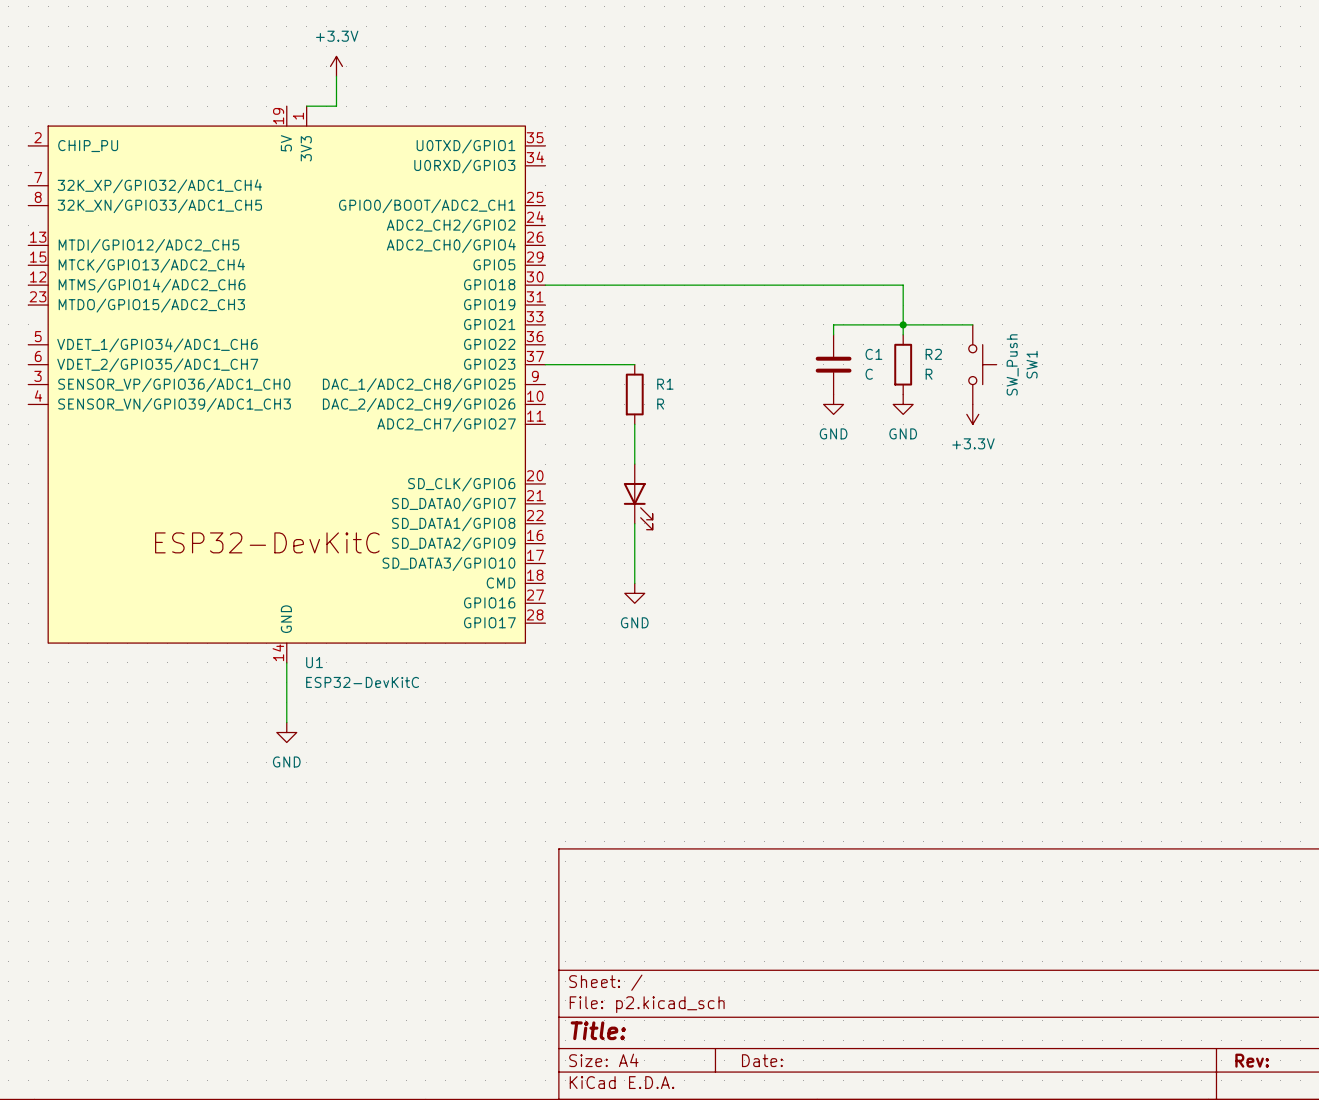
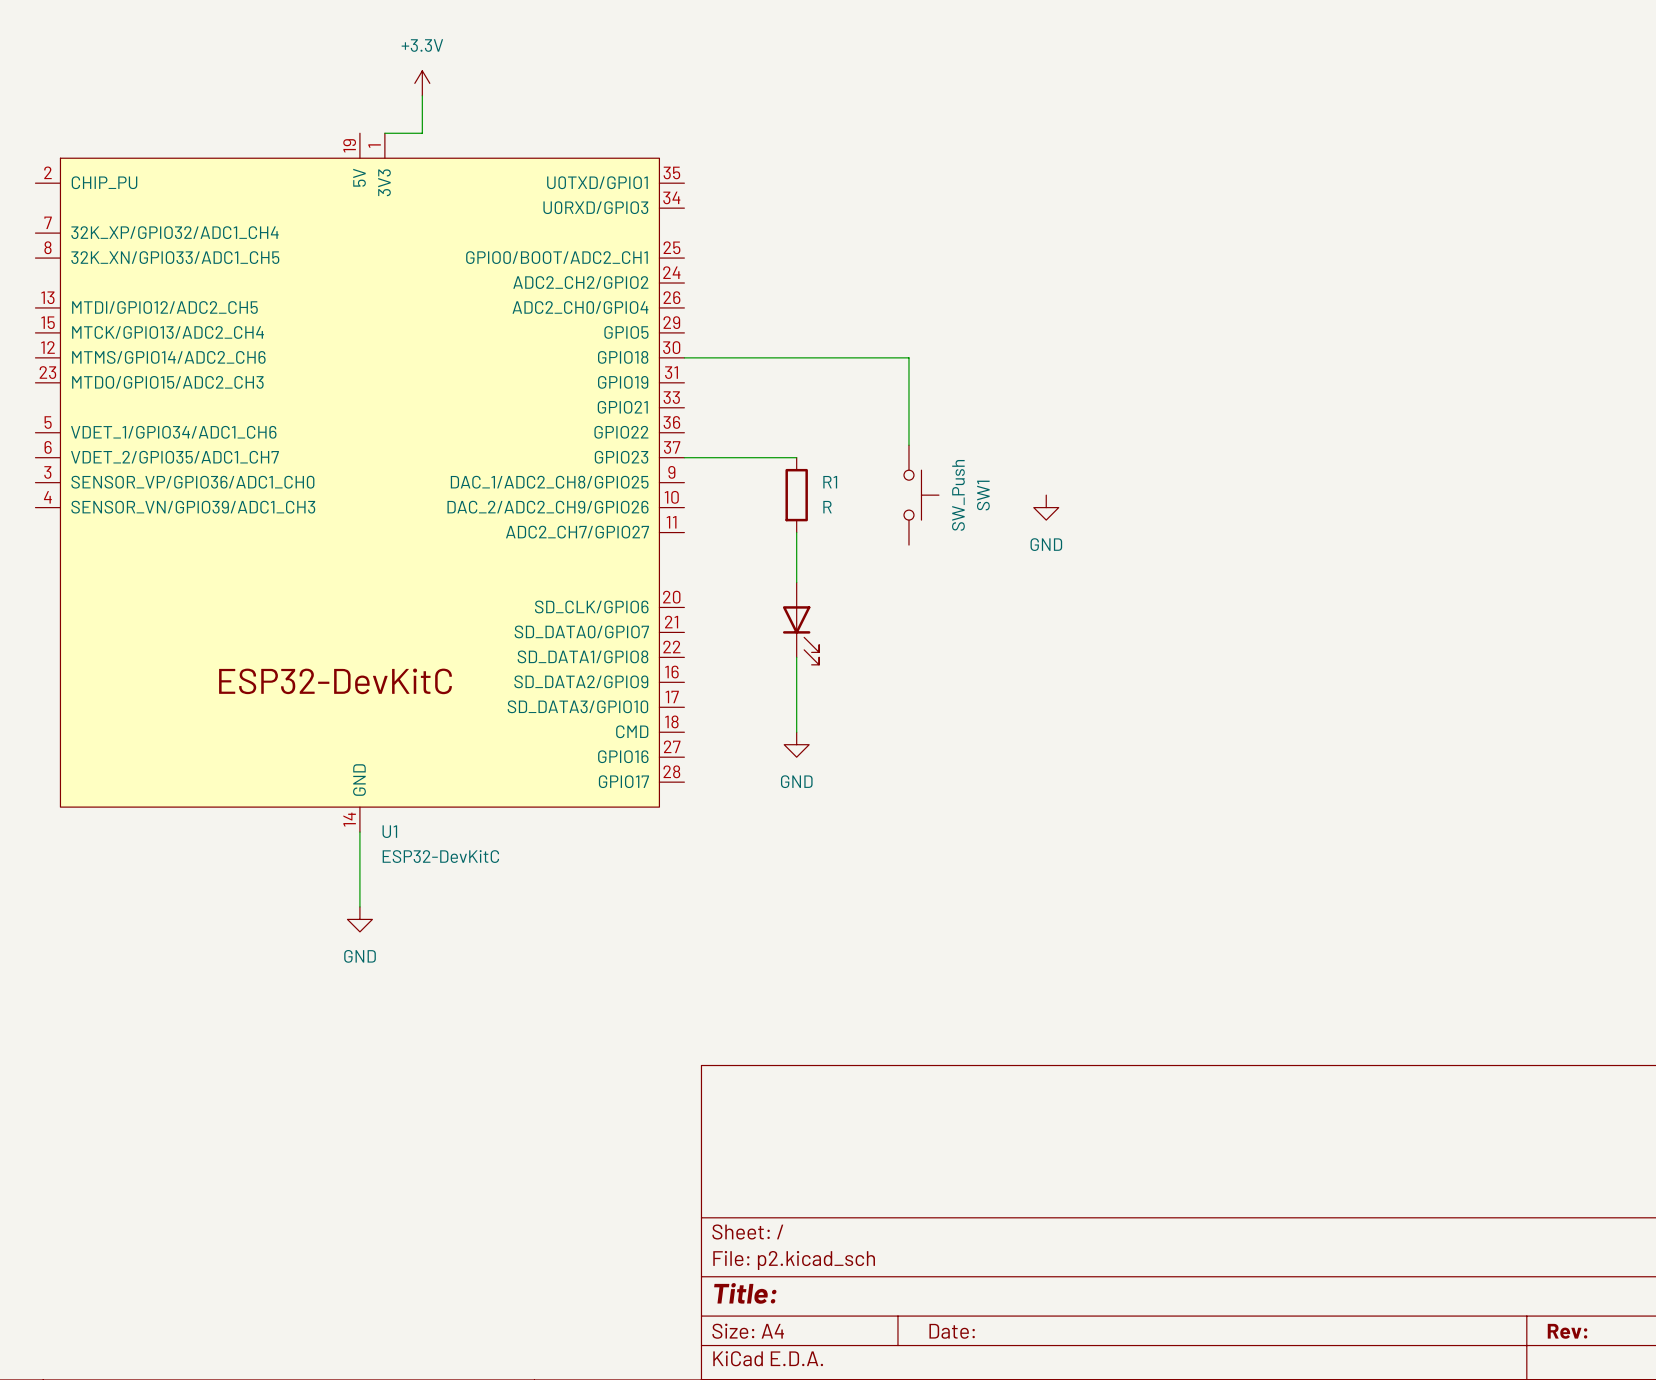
wire: (724, 285) (903, 285) (903, 334) -> (908, 357) (908, 445)
junction: (903, 324) -> none
wire: (972, 324) (833, 324) (833, 334) -> none
C1: C (833, 364) -> none
R2: R (903, 364) -> none
SW1 position: (982, 364) -> (921, 495)
power symbol: GND (903, 404) -> none
power symbol: +3.3V (972, 414) -> none

